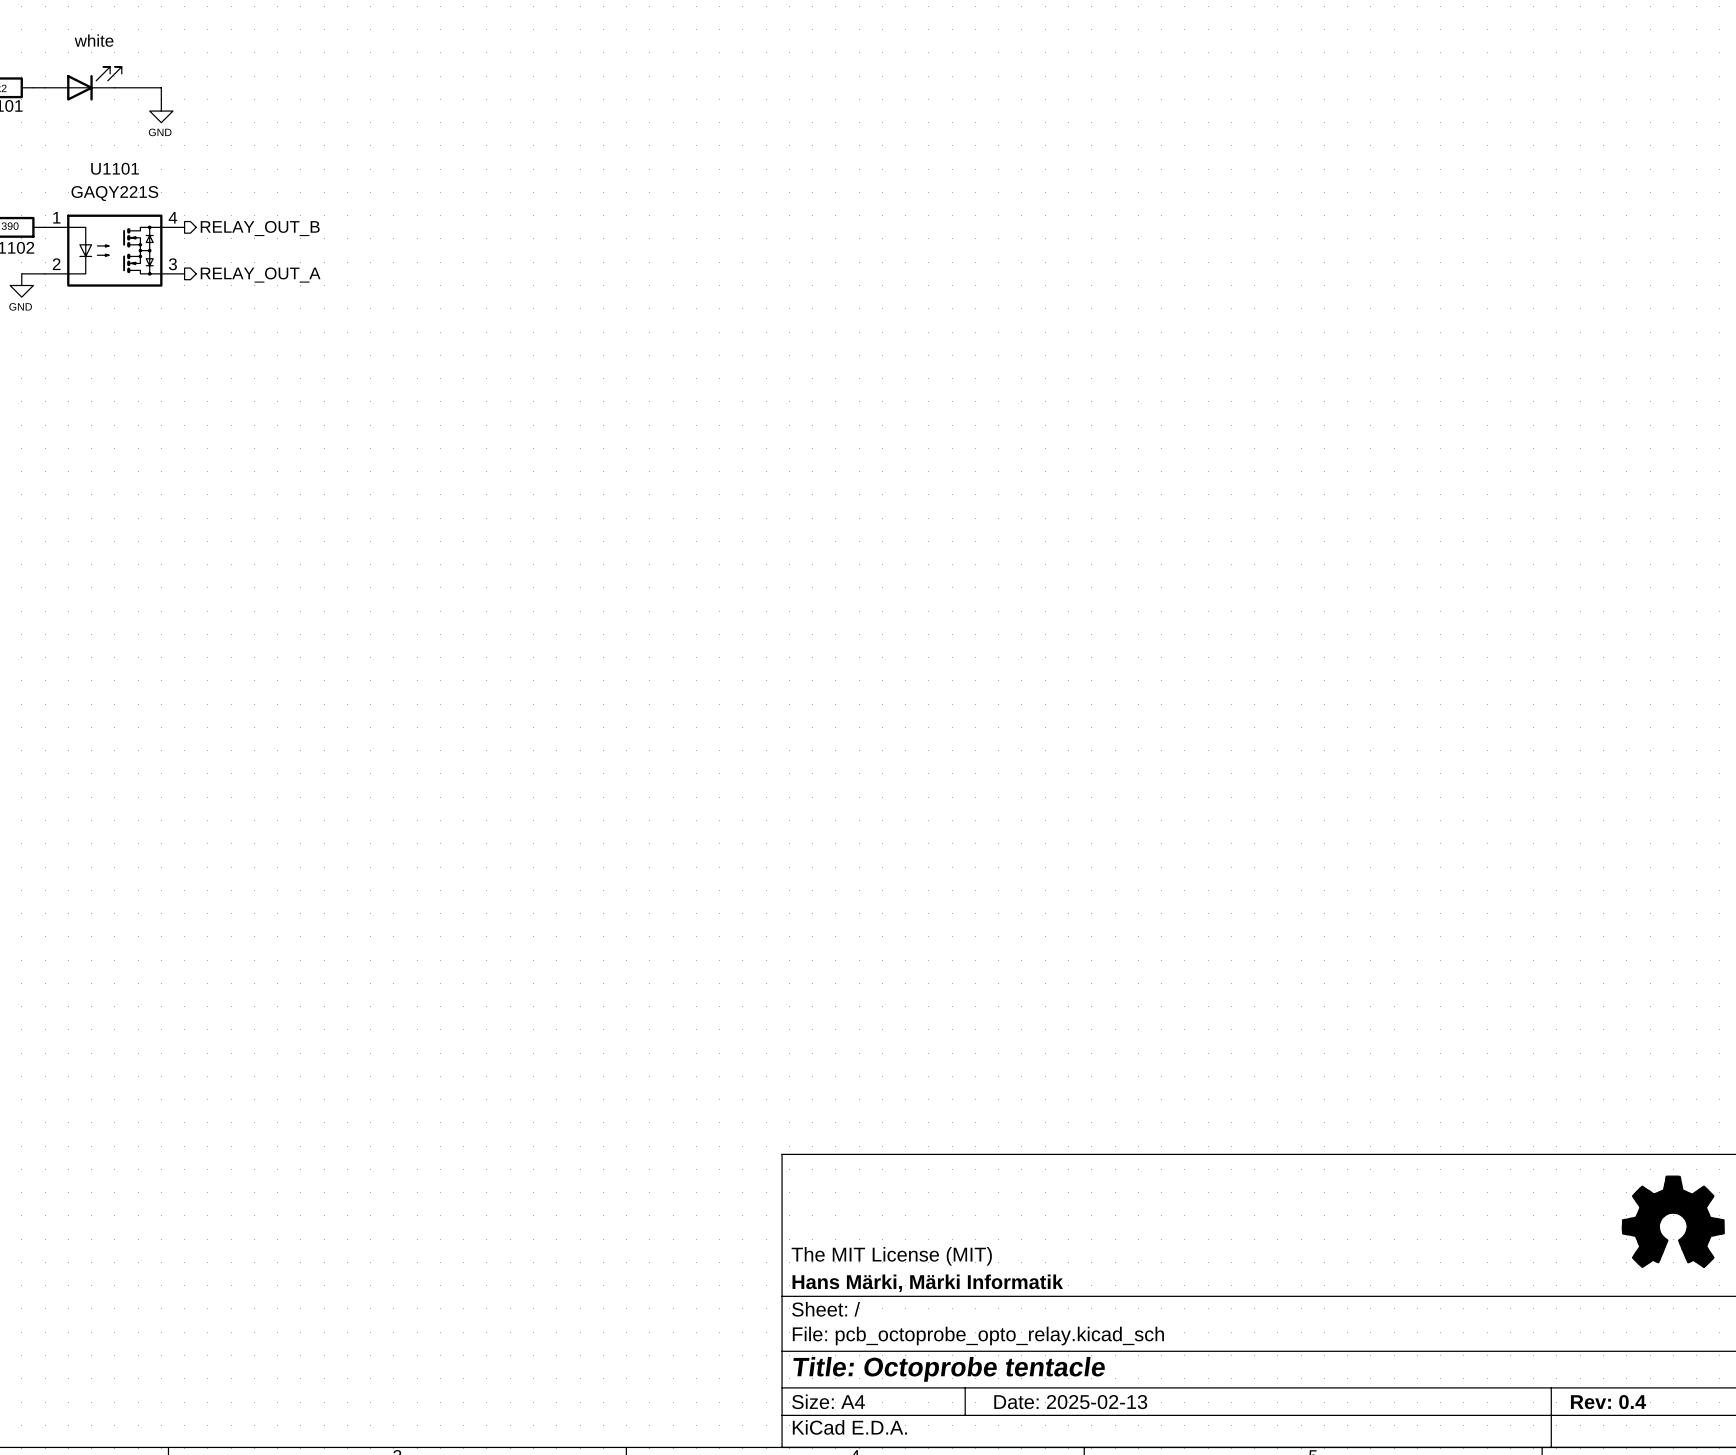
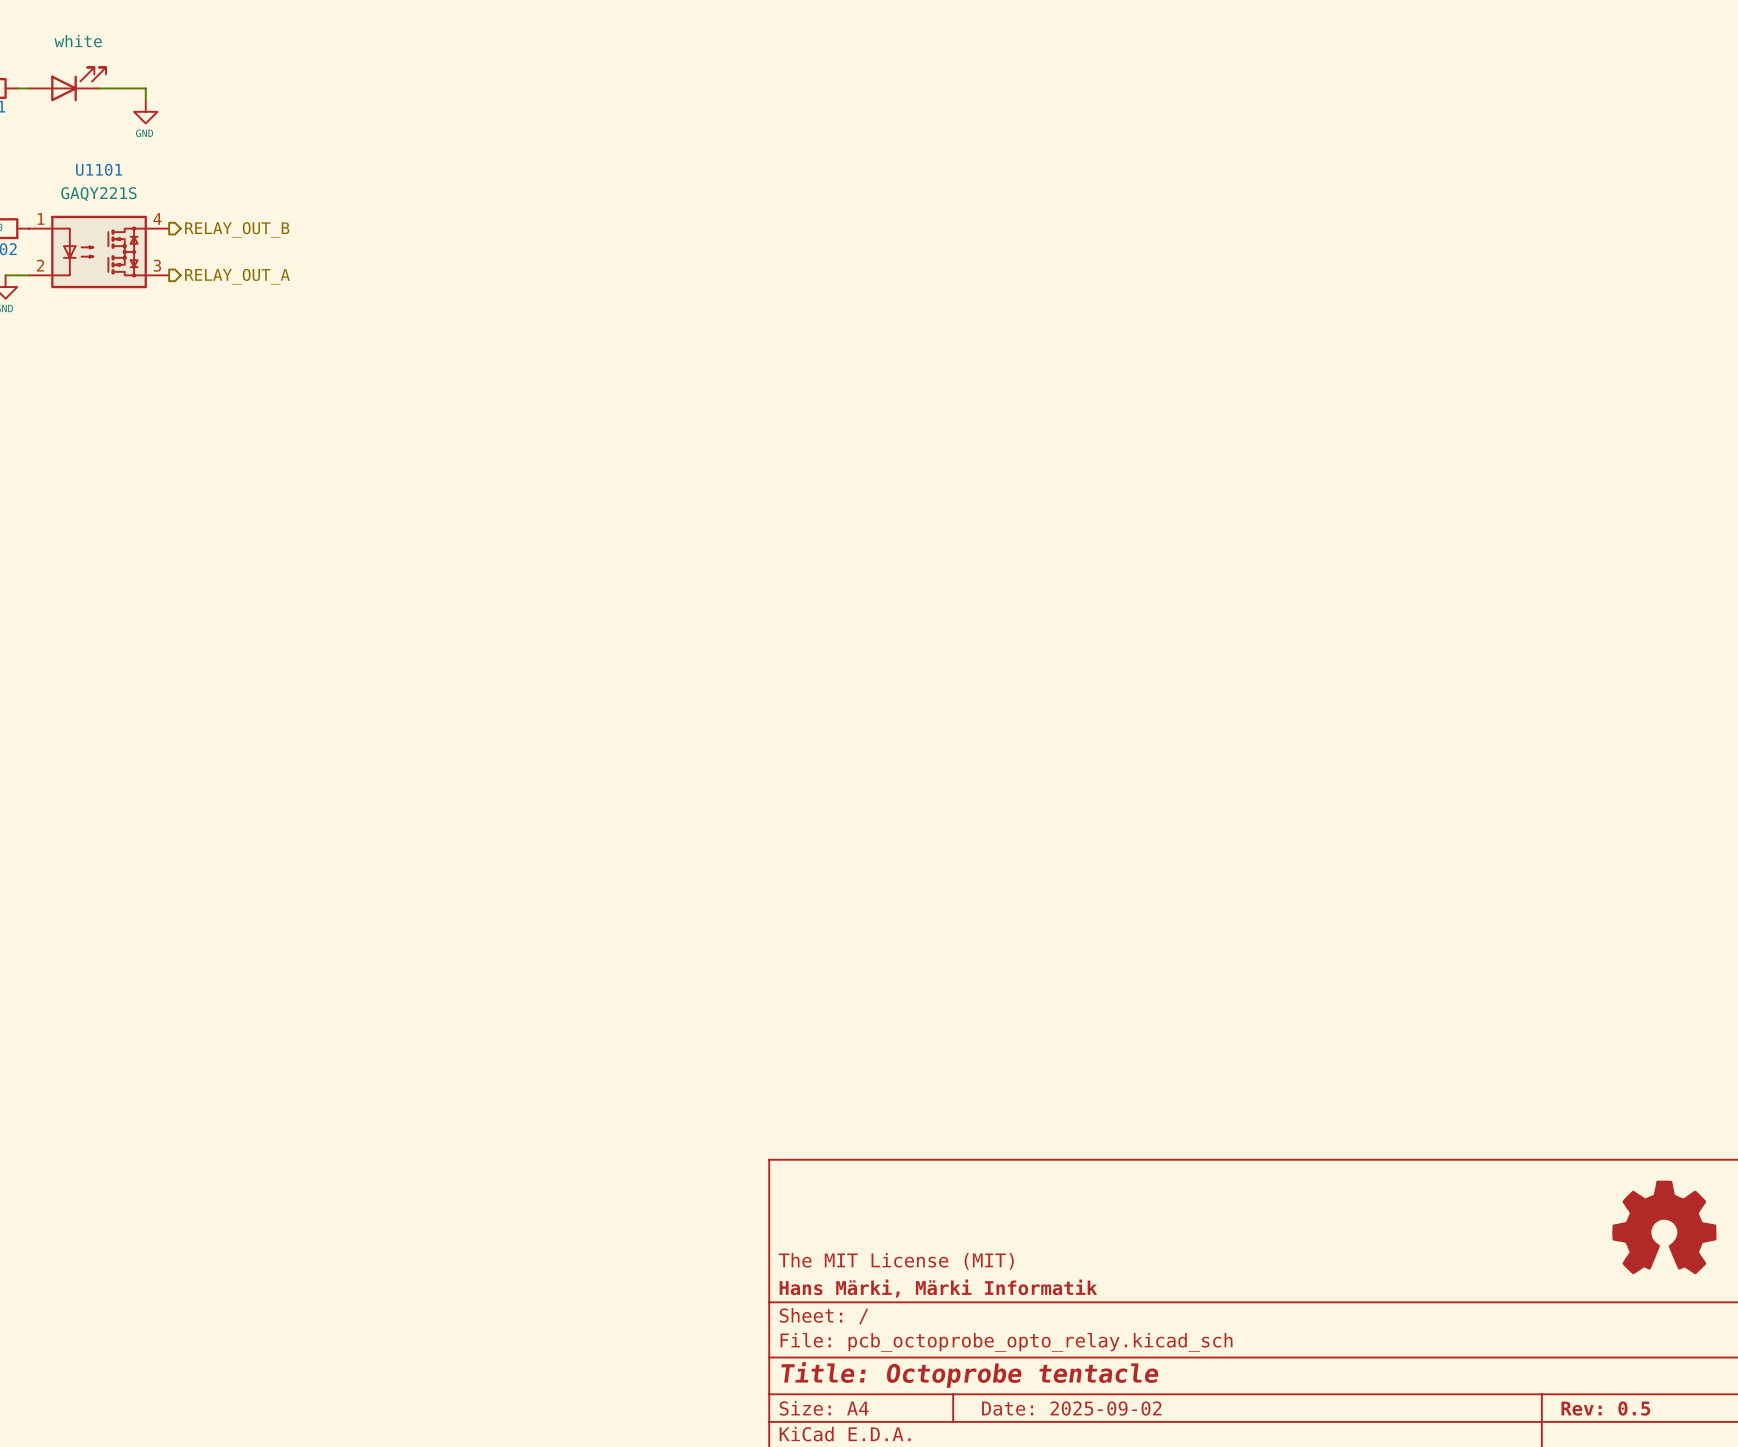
title block: Date: 2025-02-13 (1070, 1402) -> Date: 2025-09-02 (1071, 1408)
title block: Rev: 0.4 (1608, 1402) -> Rev: 0.5 (1605, 1408)

